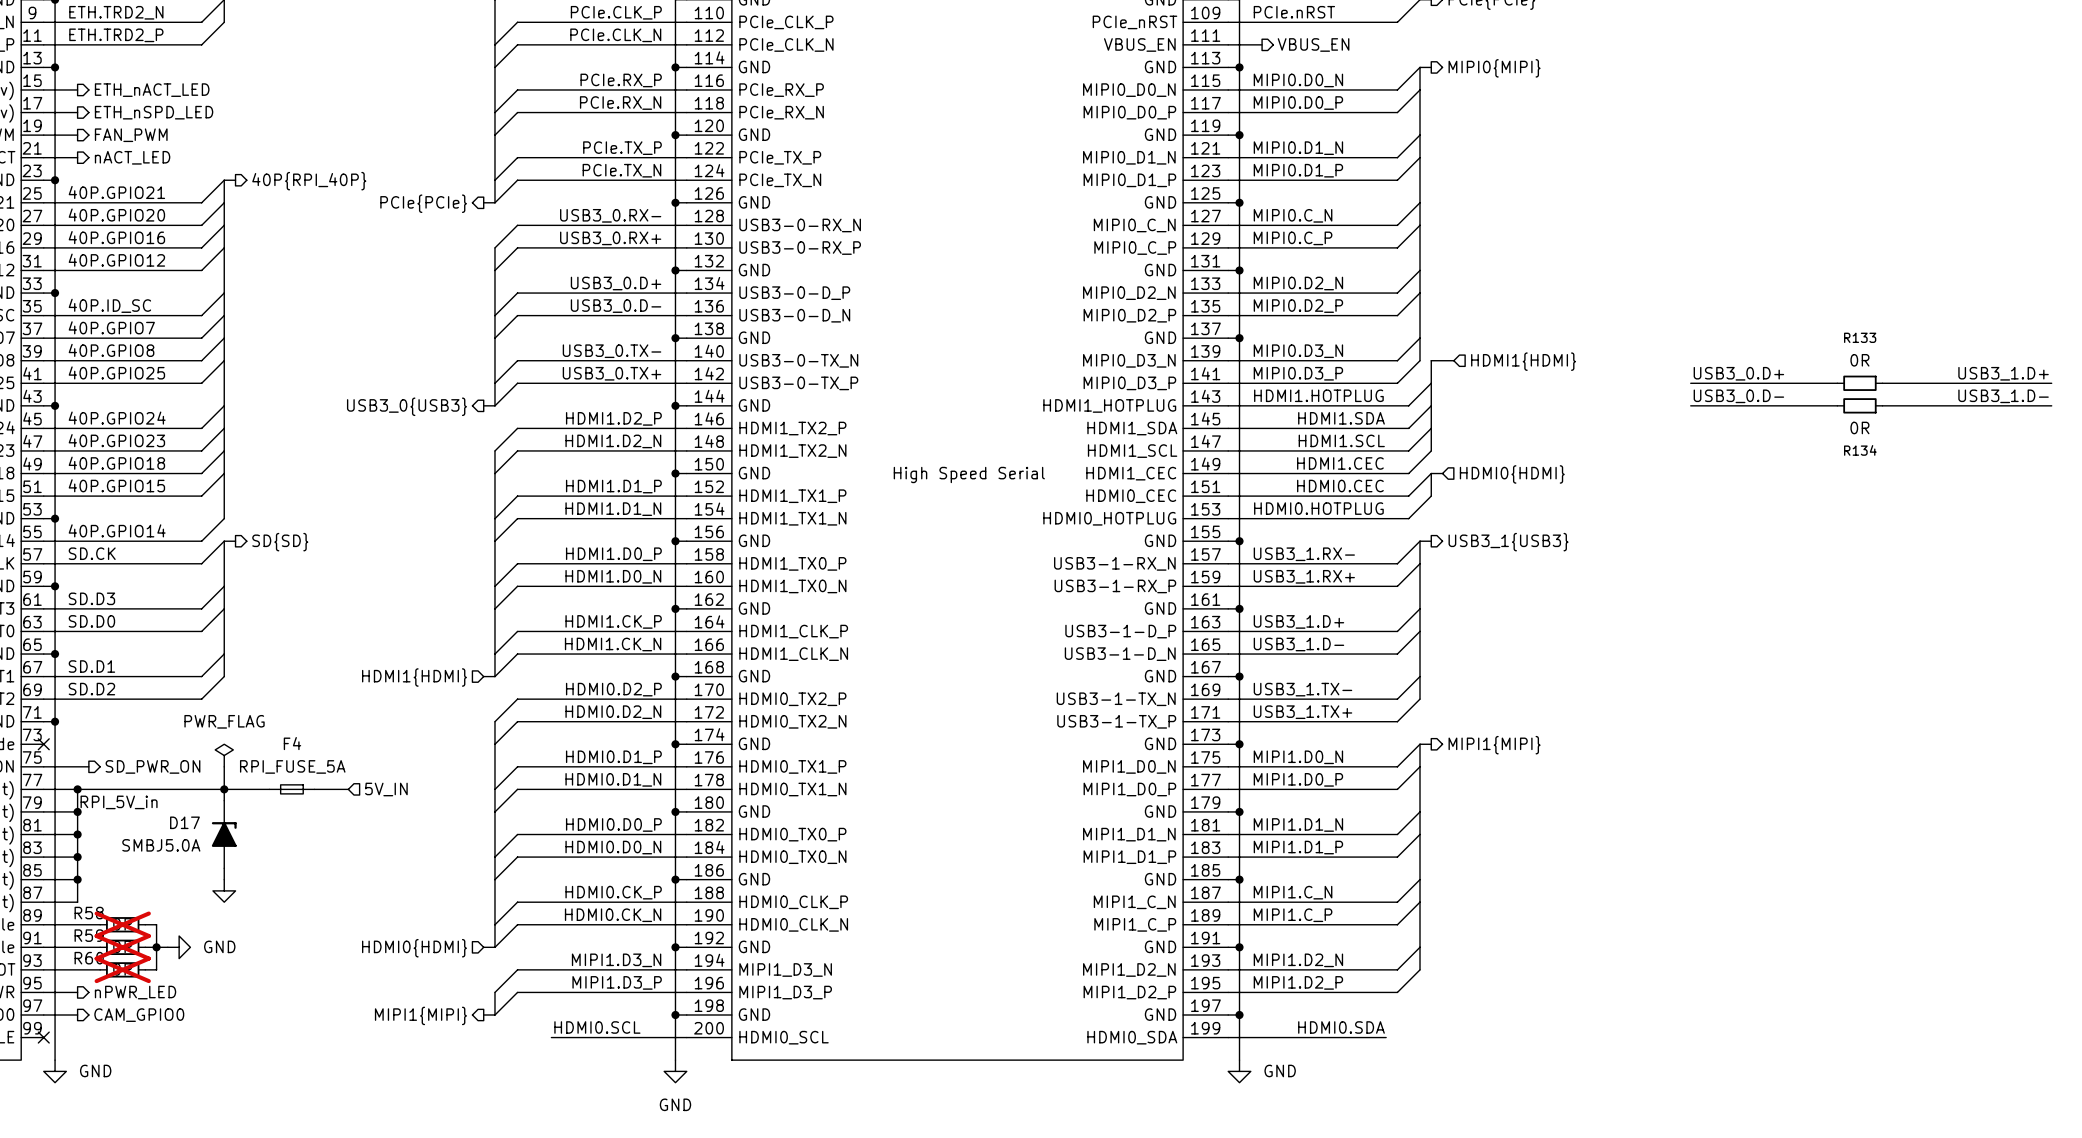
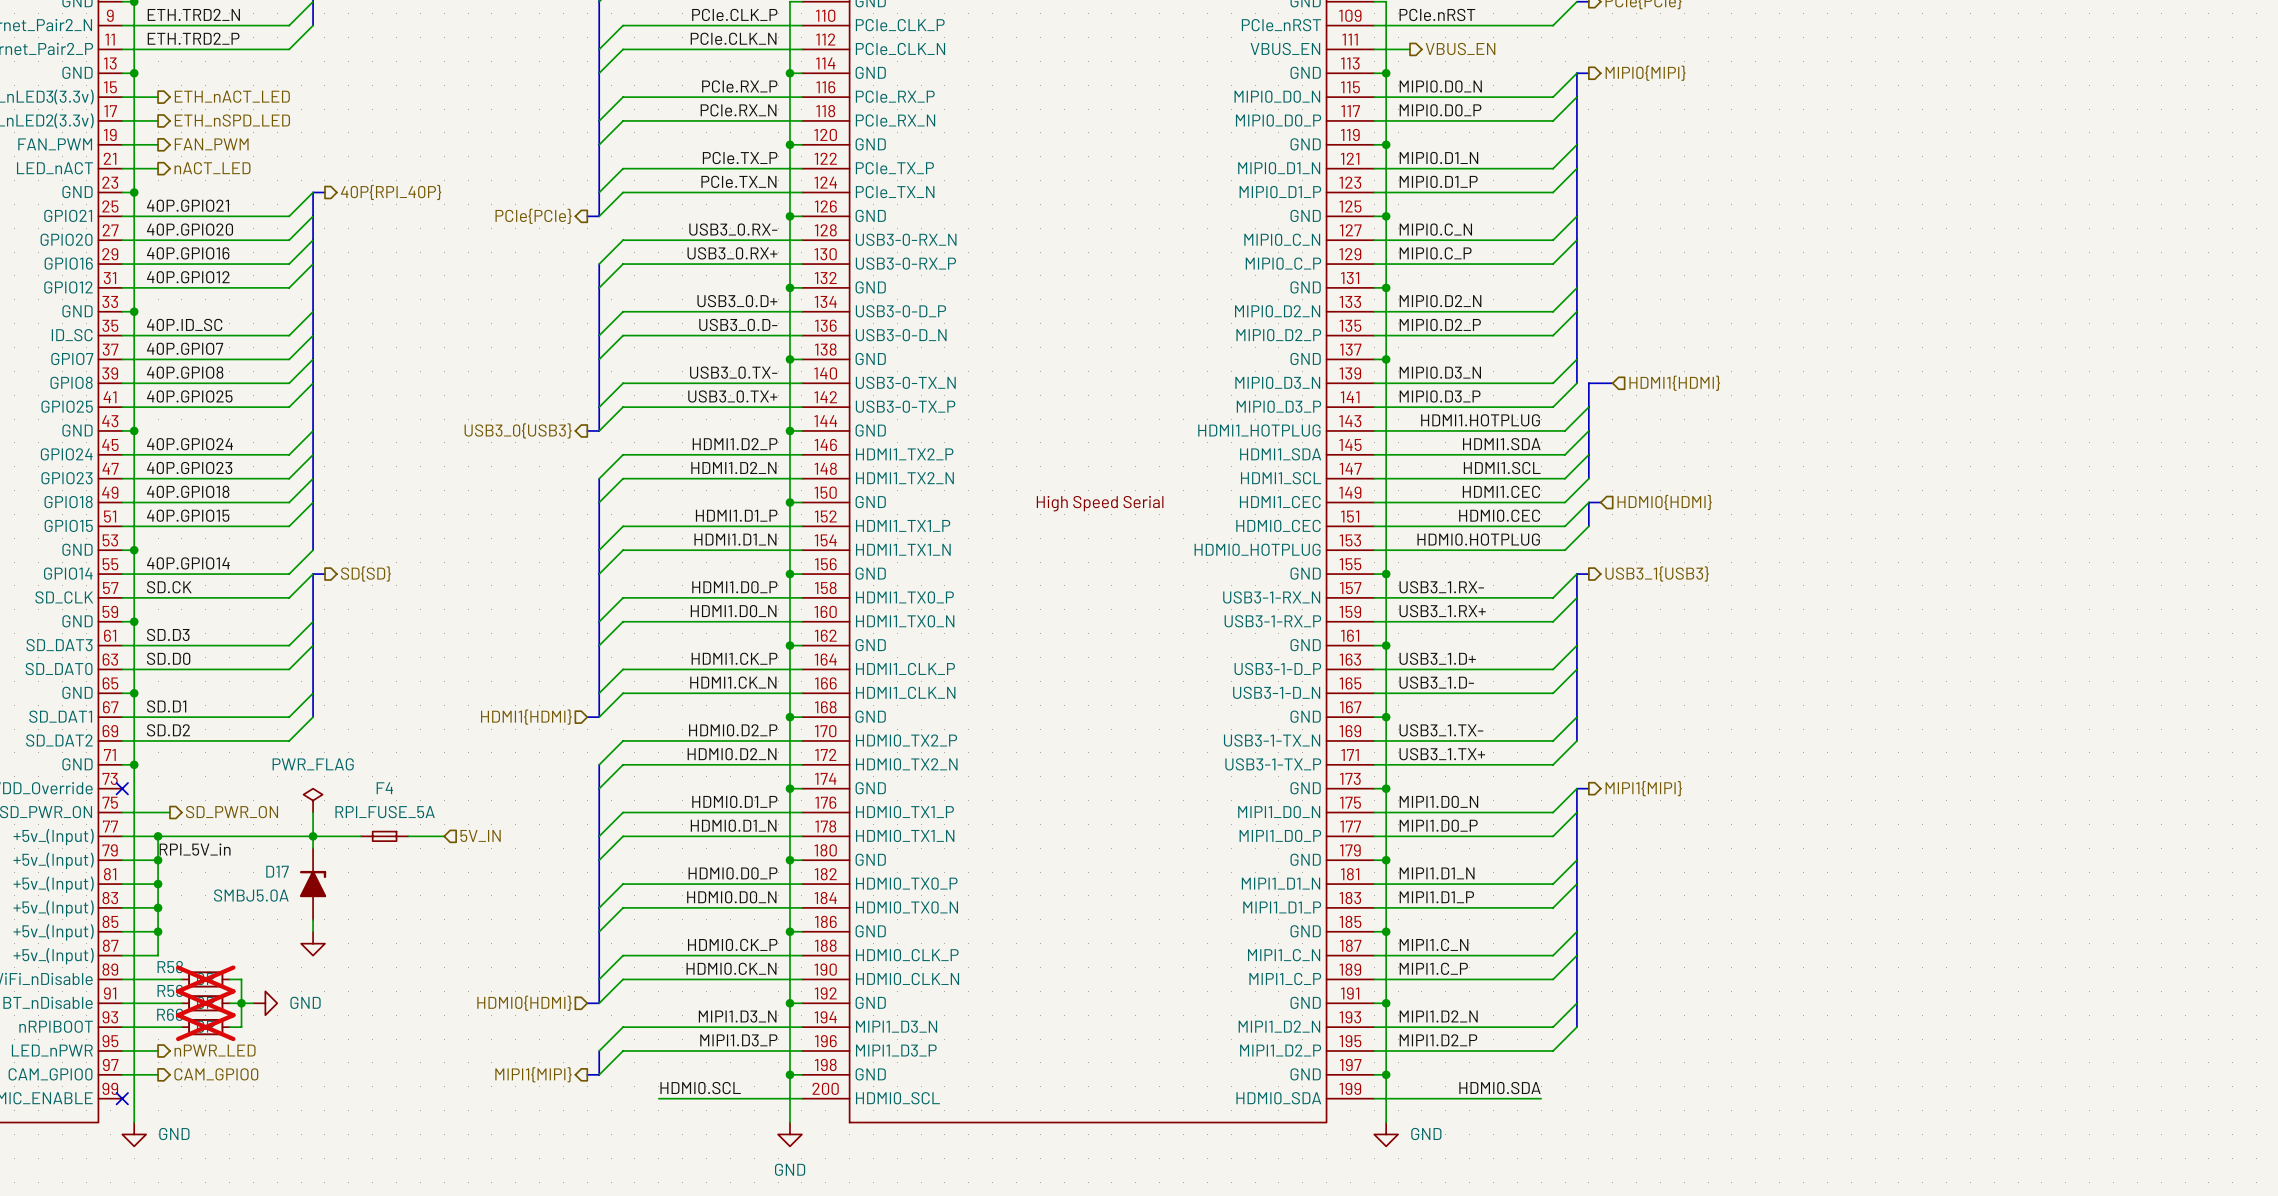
label: USB3_0.D+ (1738, 373) -> none
label: USB3_1.D+ (2003, 373) -> none
wire: (1690, 383) (1837, 383) -> none
R133: 0R (1859, 383) -> none
wire: (1882, 383) (2051, 383) -> none
label: USB3_0.D- (1738, 396) -> none
label: USB3_1.D- (2003, 396) -> none
wire: (1690, 405) (1837, 405) -> none
R134: 0R (1859, 405) -> none
wire: (1882, 405) (2051, 405) -> none

